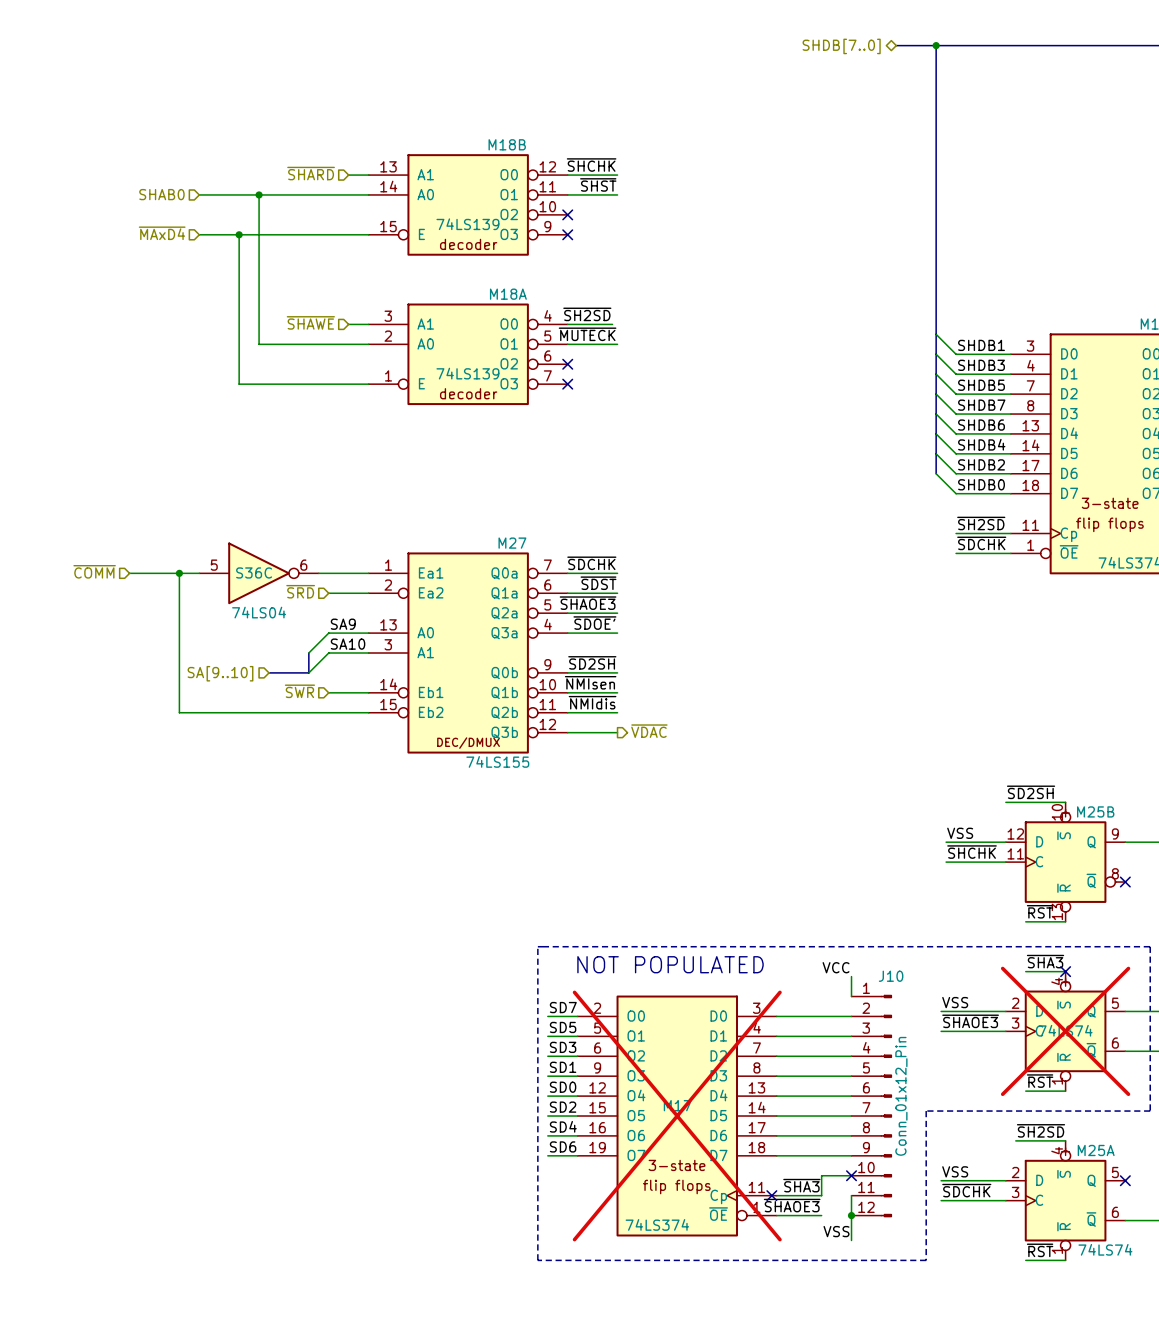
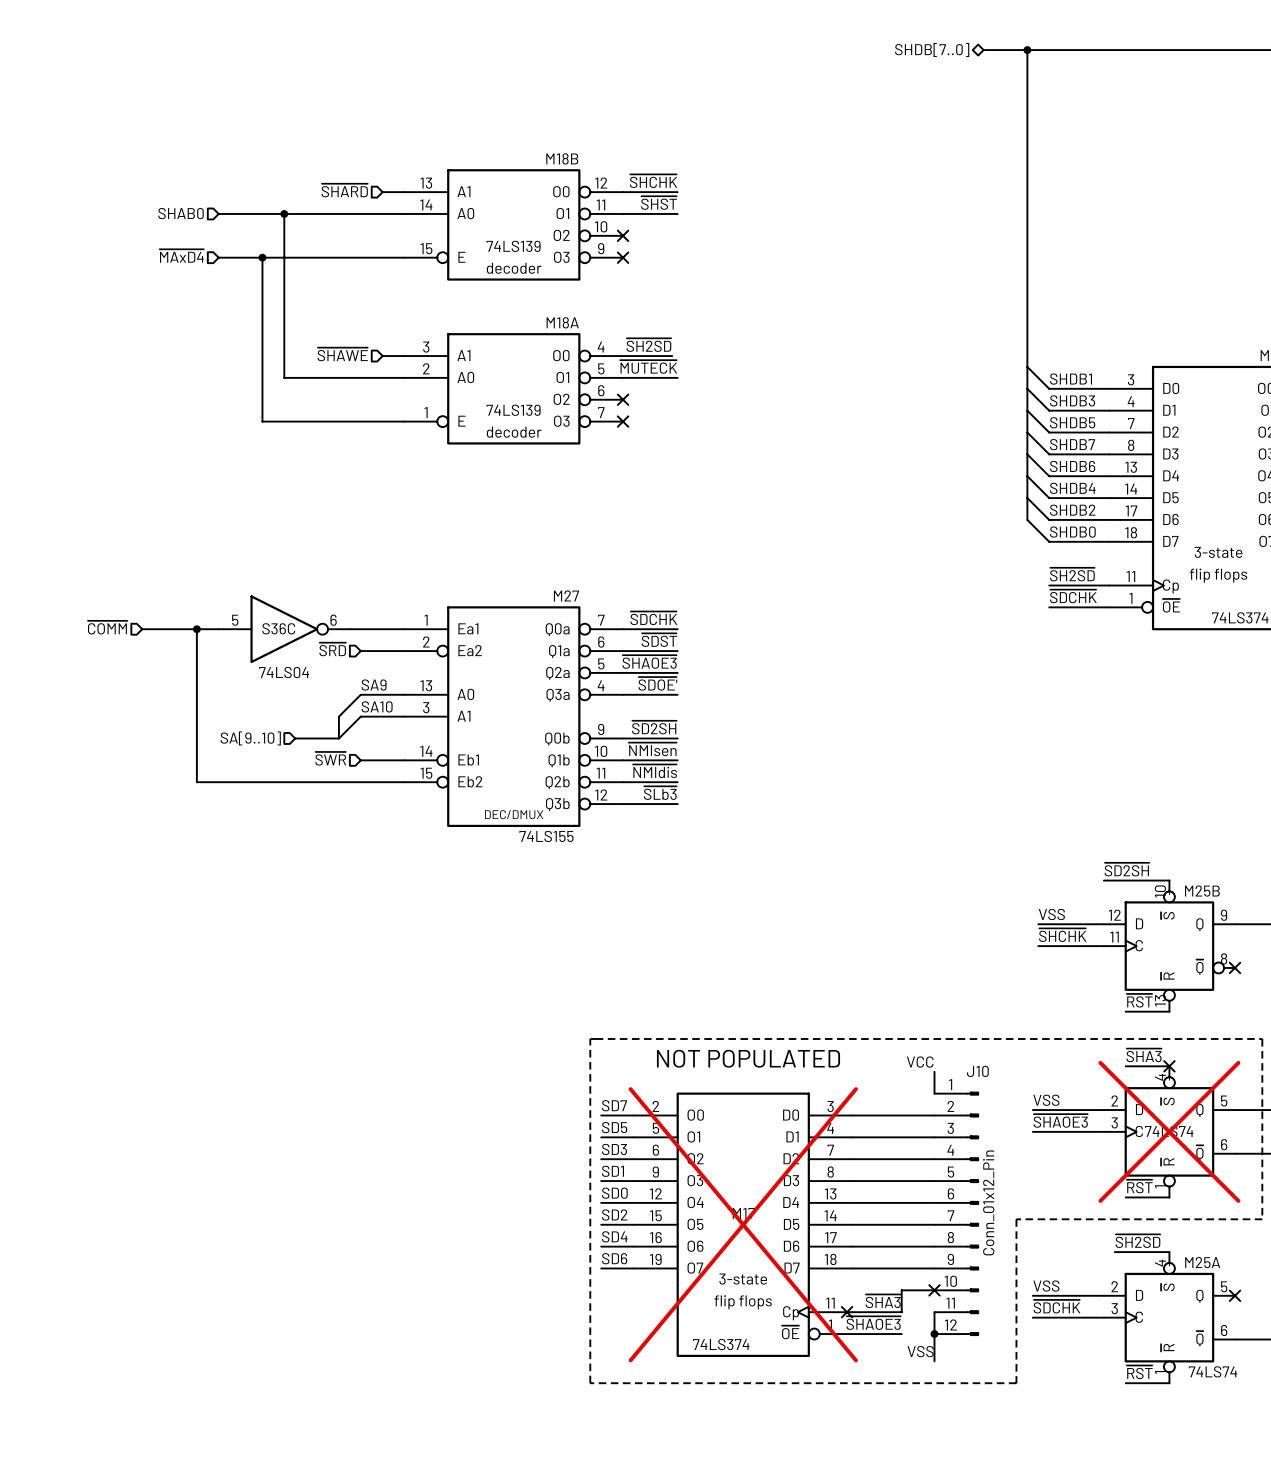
label: none -> ~{SLb3} (660, 793)
hierarchical label: ~{VDAC} (649, 731) -> none

